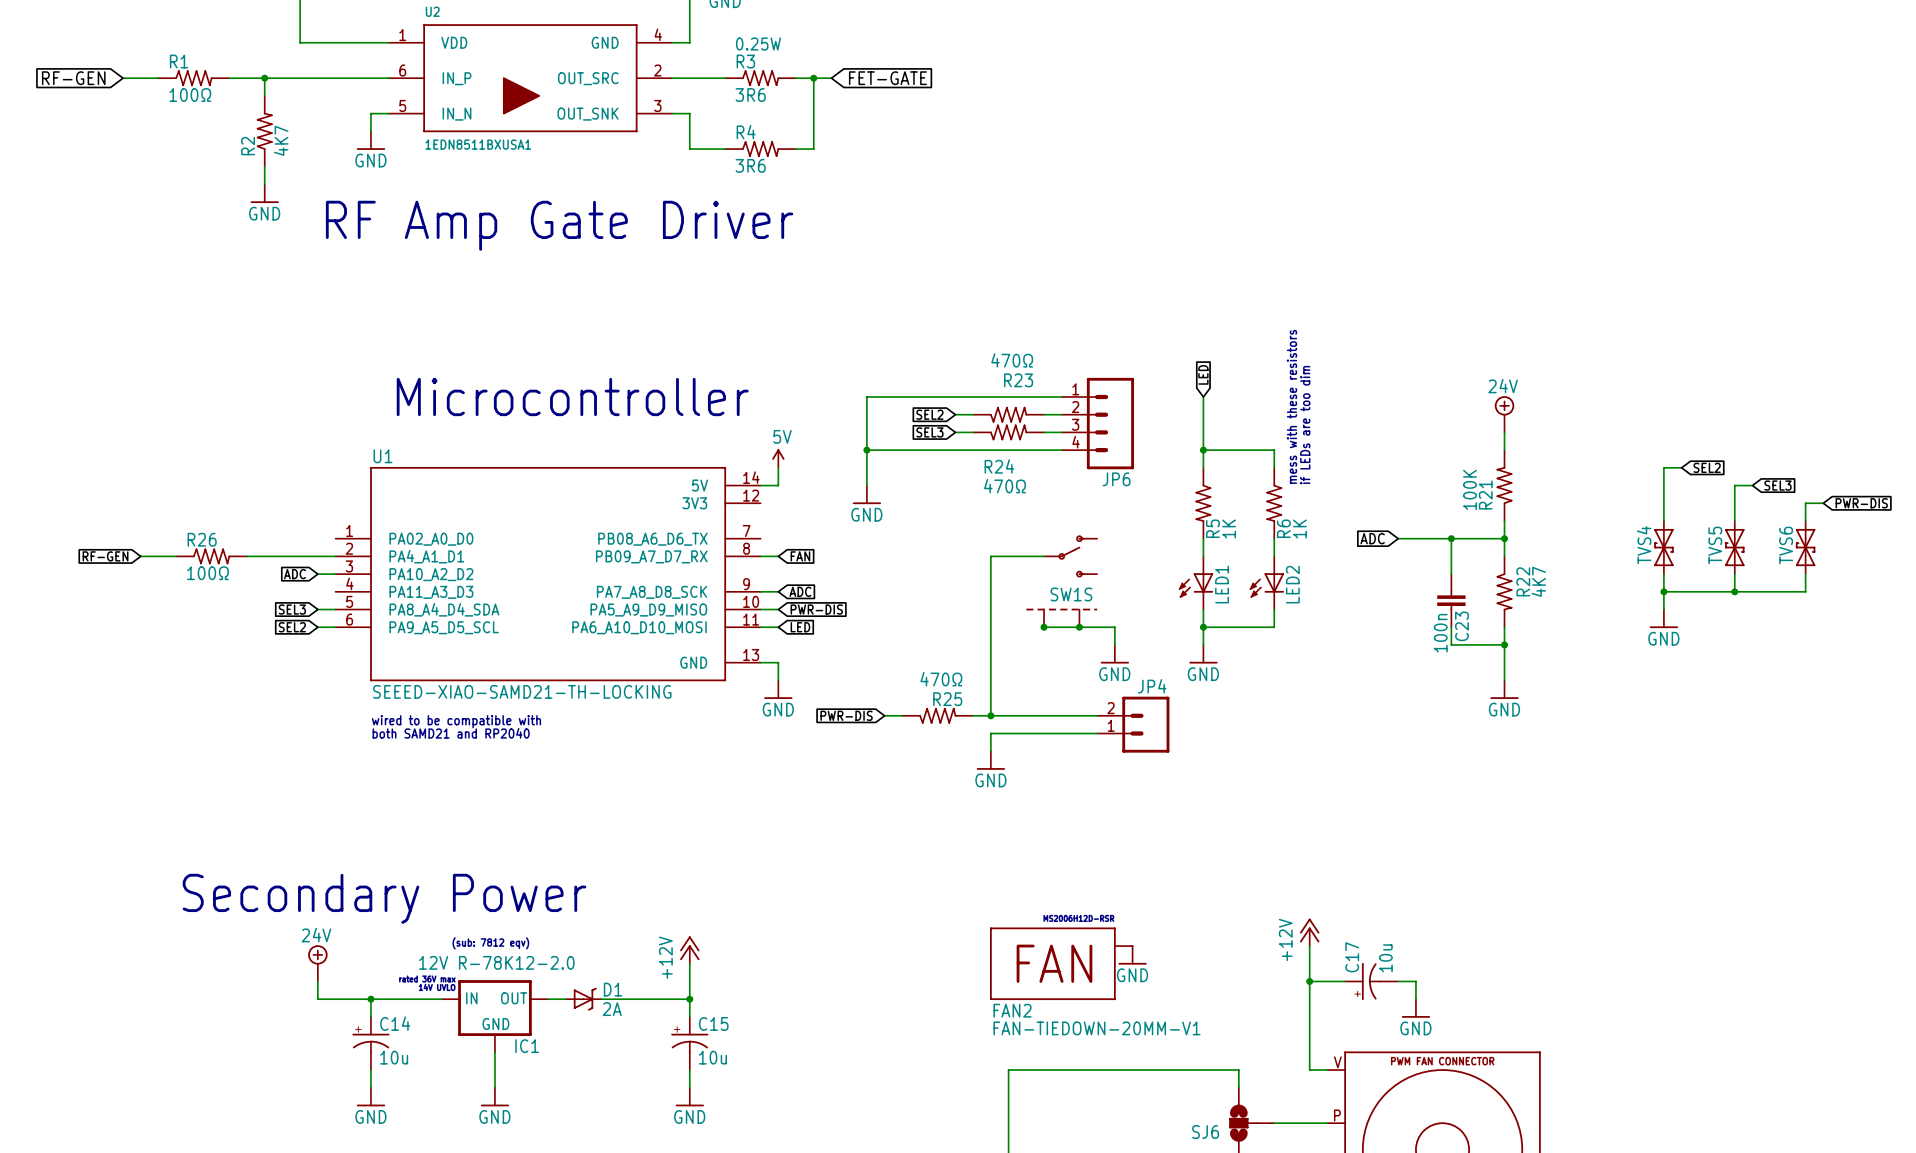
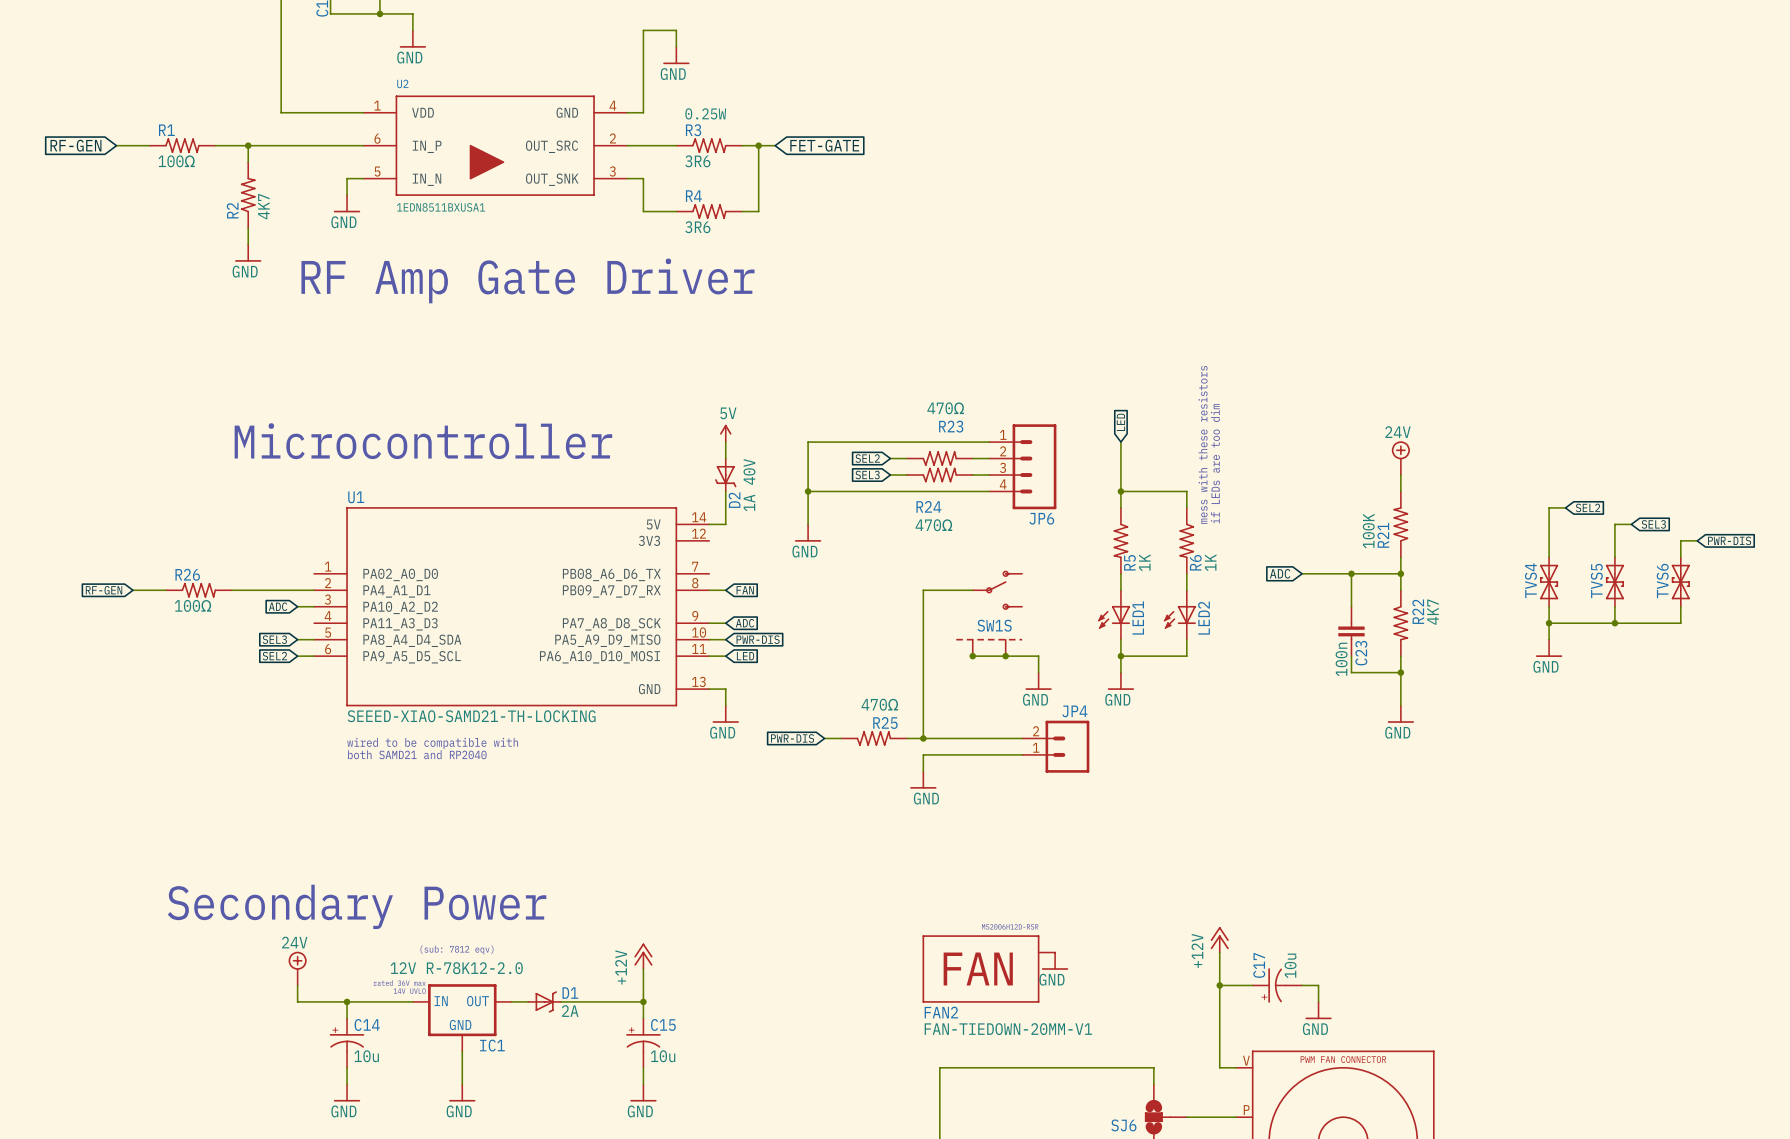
text position: Microcontroller (572, 396) -> Microcontroller (423, 441)
wire: none -> (725, 442) (725, 458)
D2: none -> 1A 40V (725, 475)
power symbol position: 5V (778, 458) -> 5V (725, 433)

